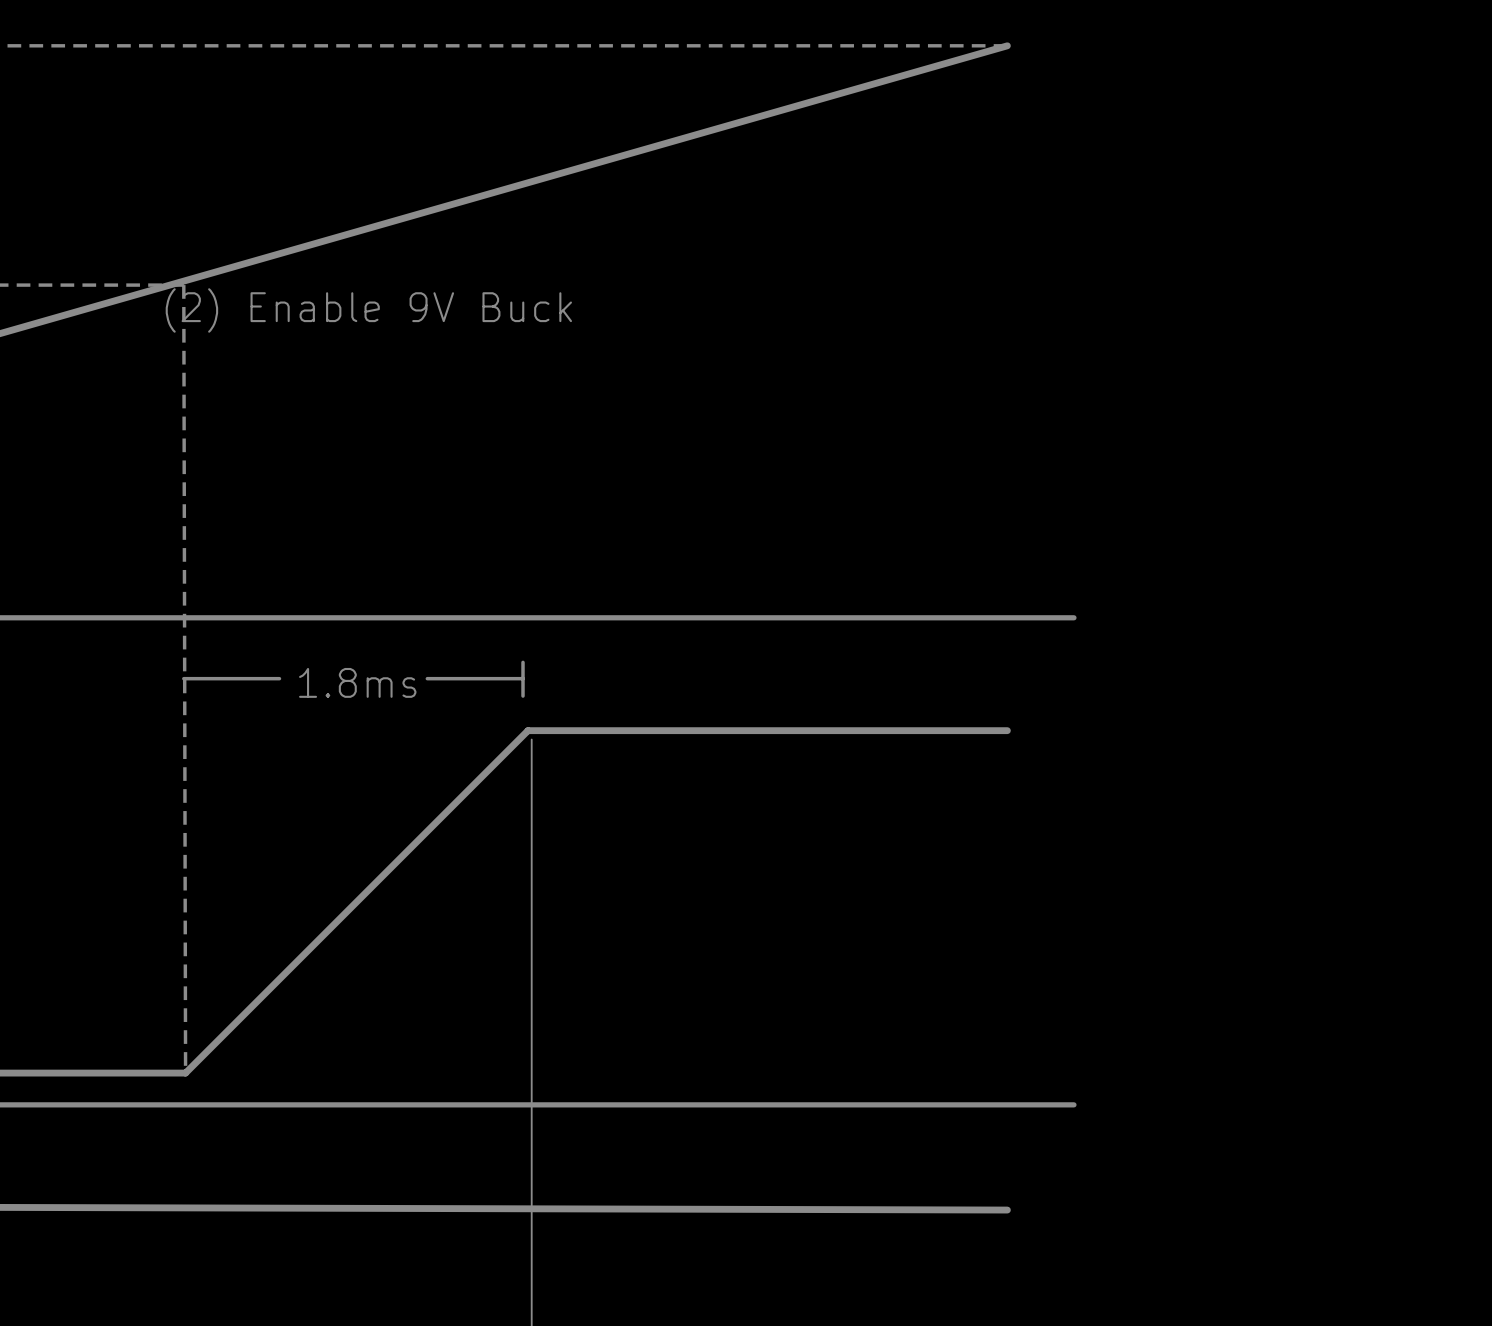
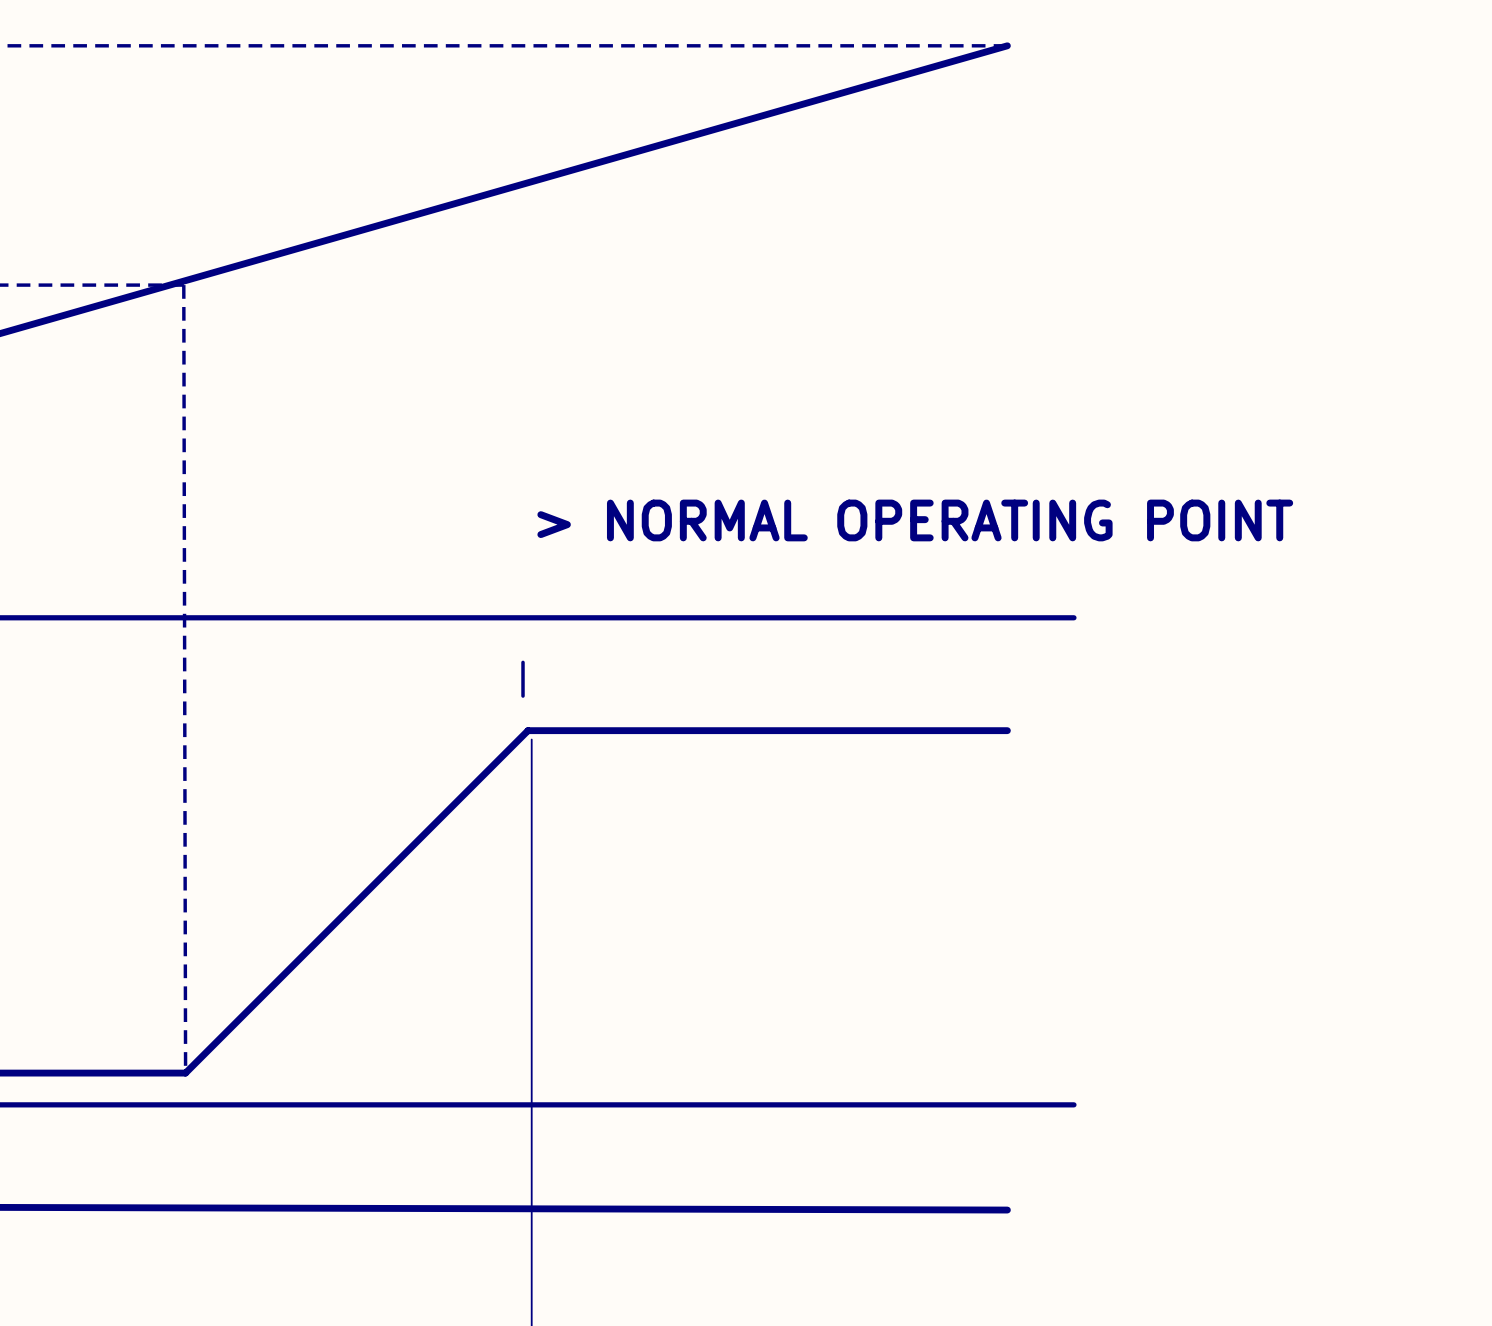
text: (2) Enable 9V Buck (368, 310) -> none
text: none -> > NORMAL OPERATING POINT (915, 520)
line: (183, 678) (279, 678) -> none
line: (427, 678) (523, 678) -> none
text: 1.8ms (357, 682) -> none

